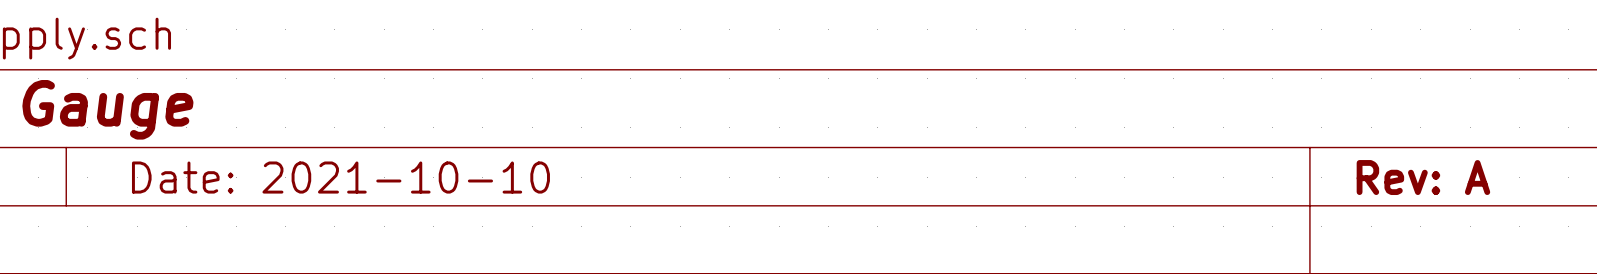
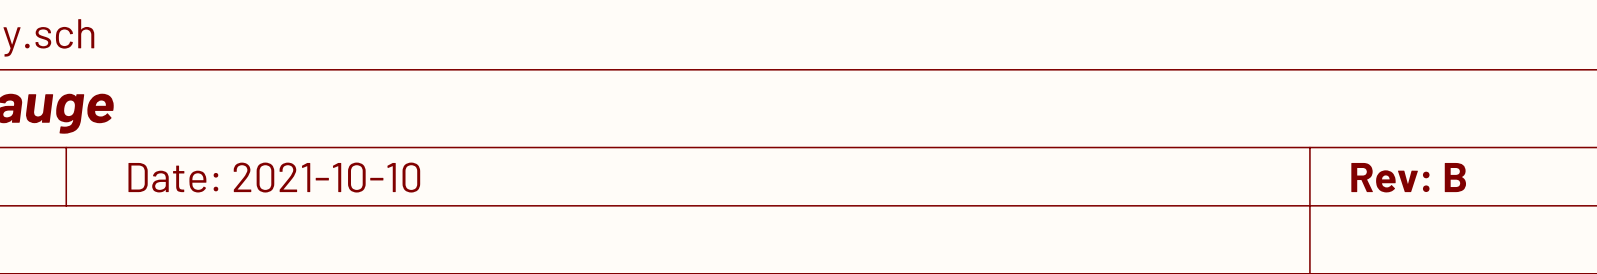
title block: Rev: A (1423, 177) -> Rev: B (1408, 177)

